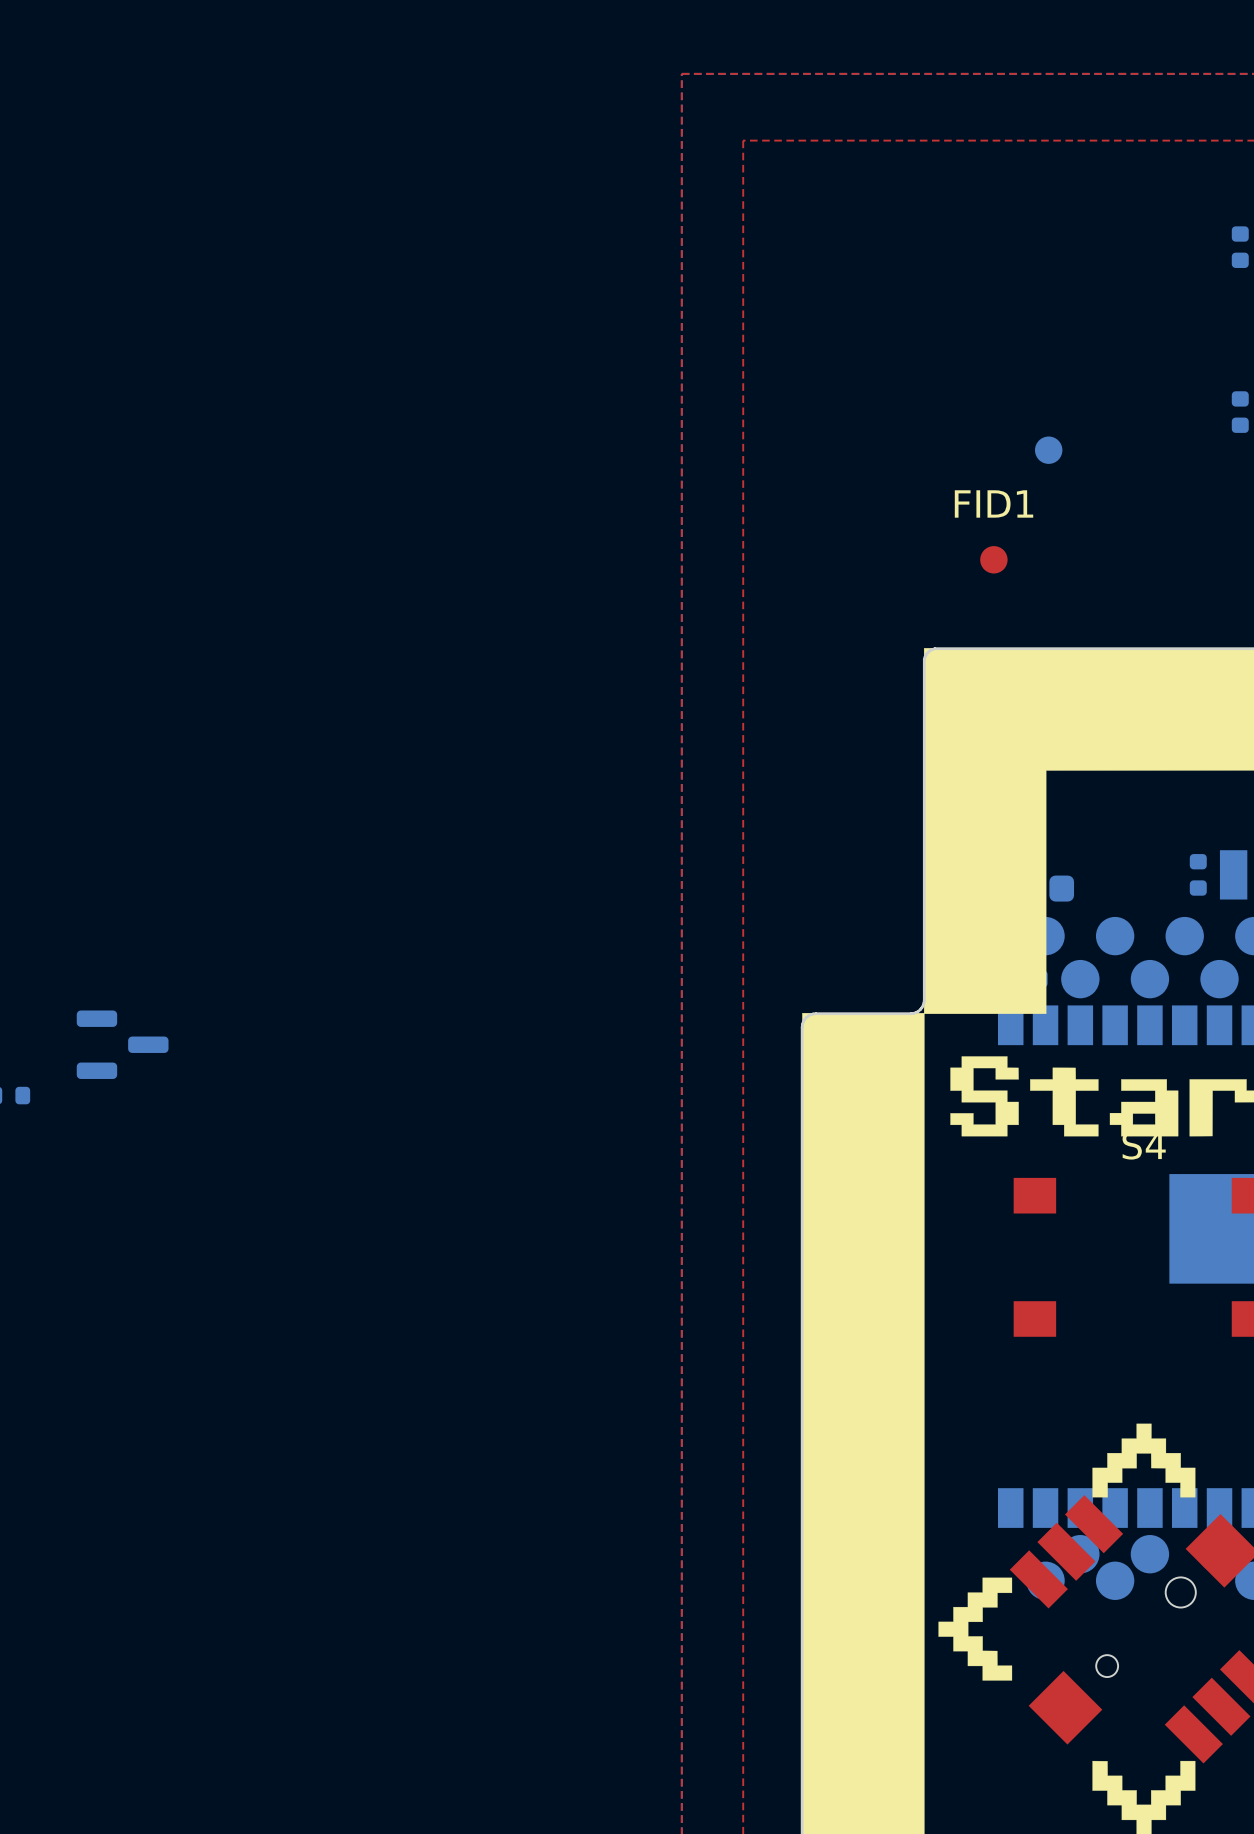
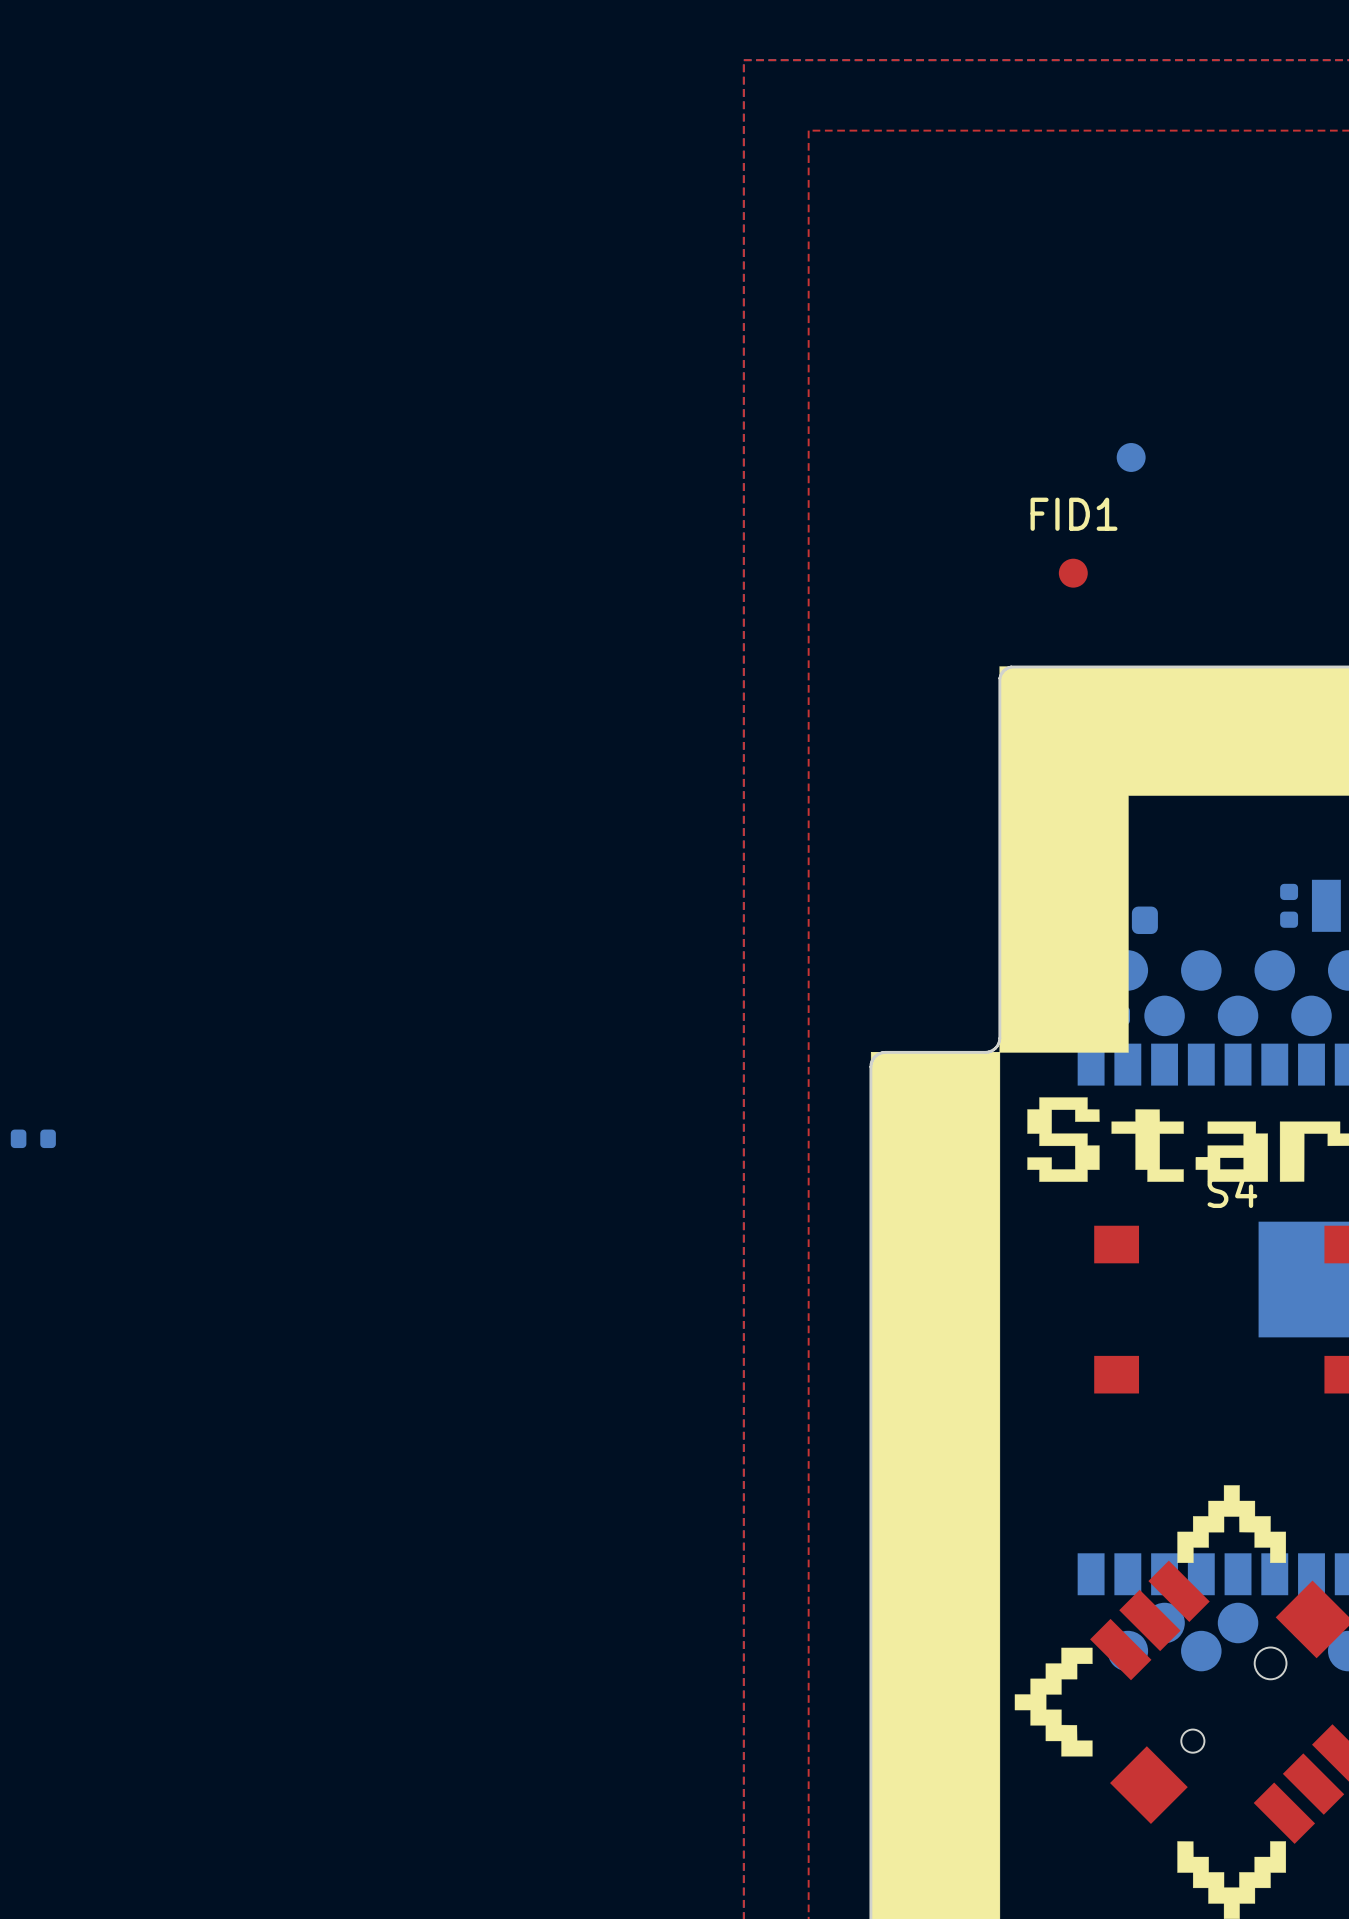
part: (1240, 247) -> none
part: (1240, 412) -> none
part: (122, 1044) -> none

